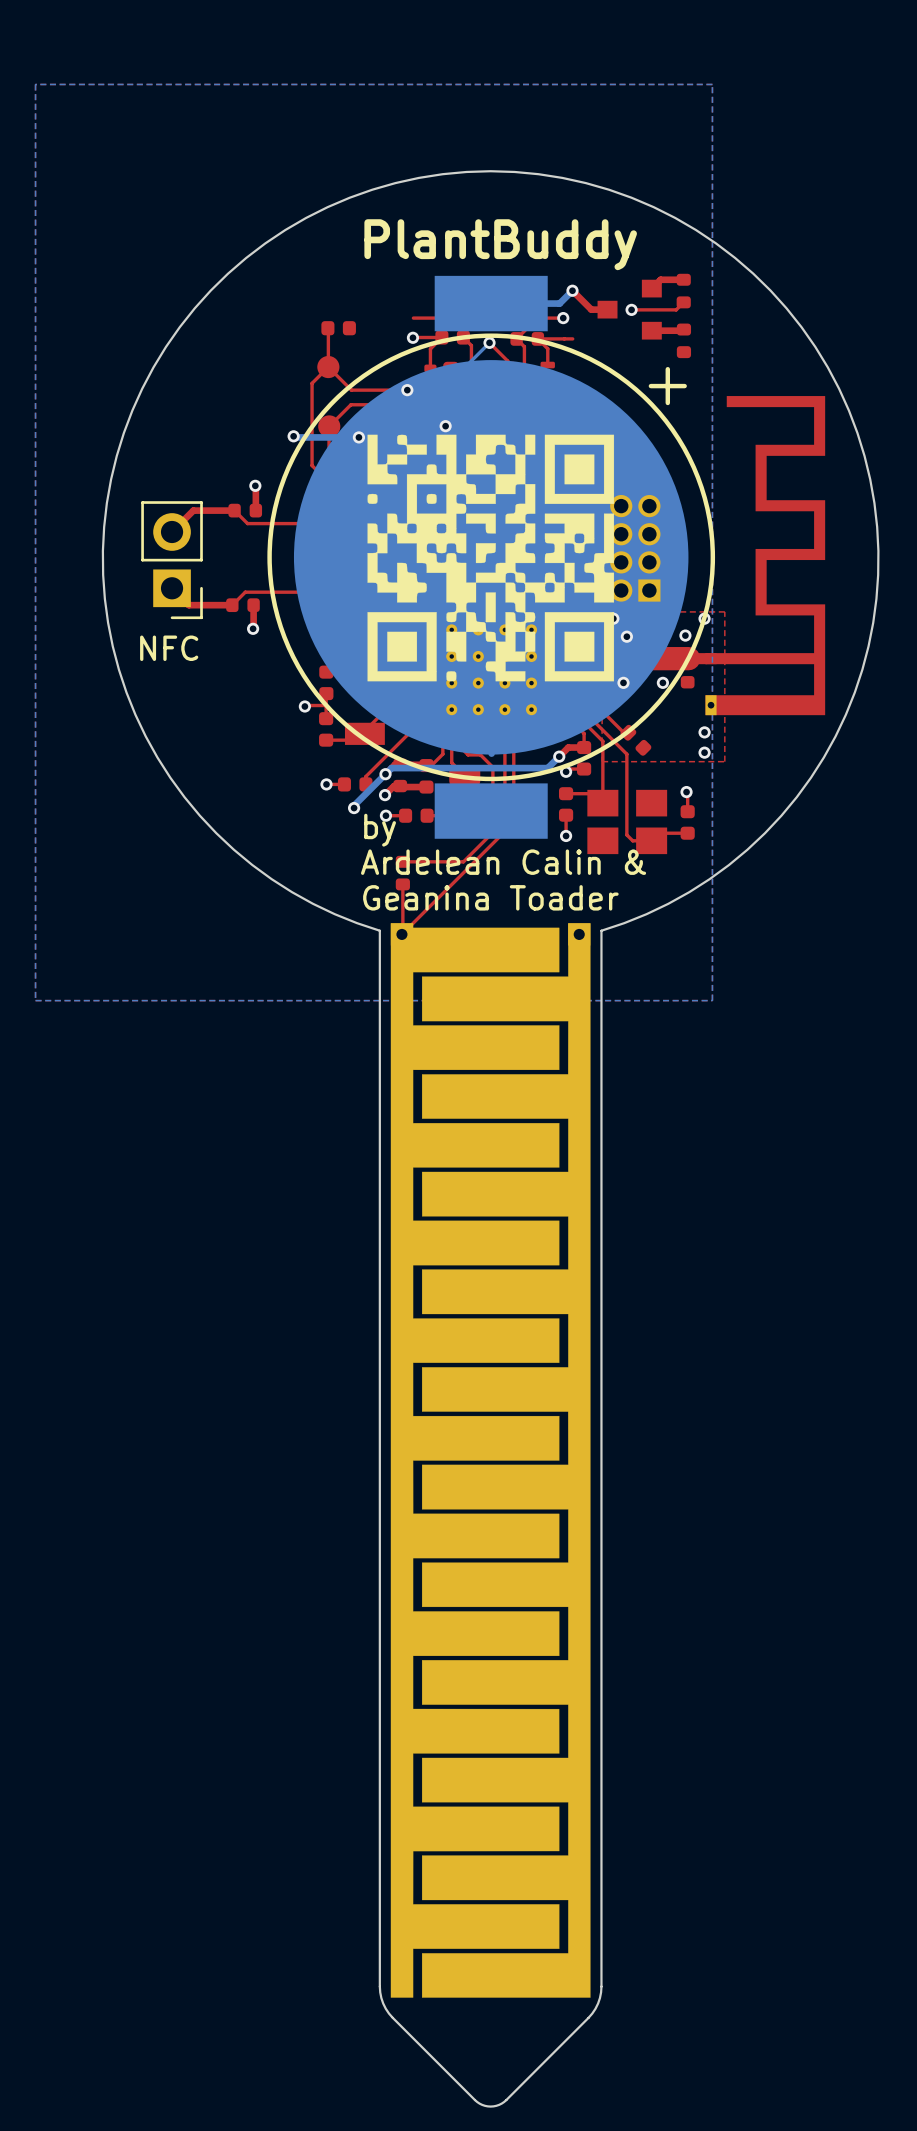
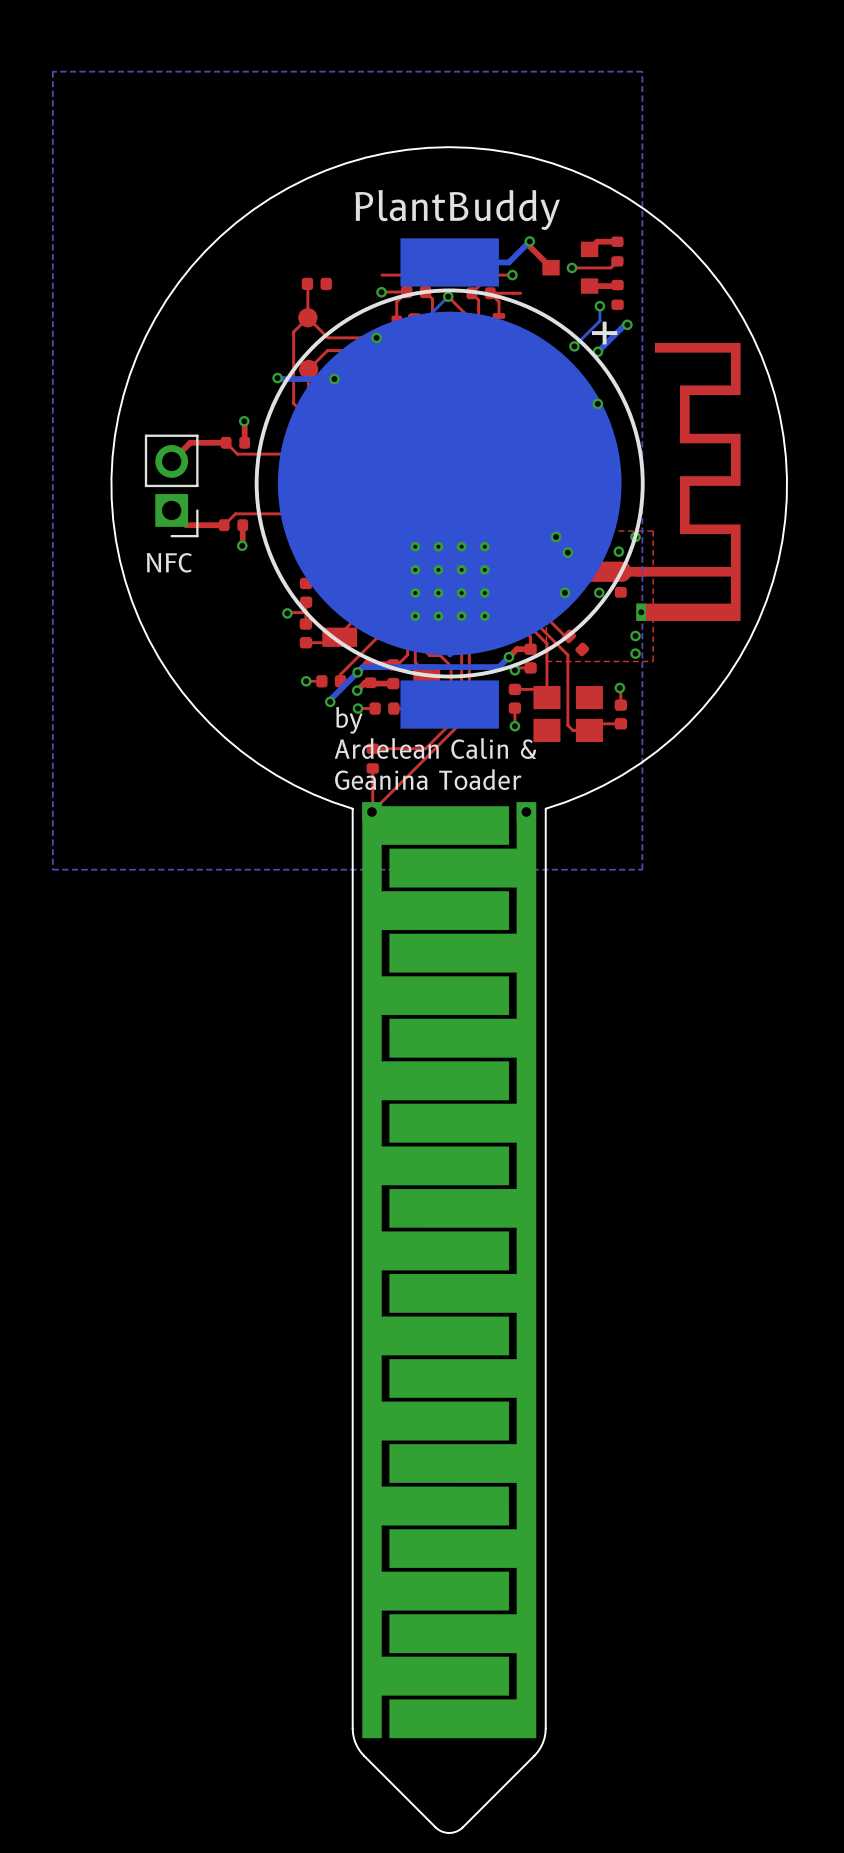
top track: (572, 290) (591, 309) (607, 309) -> (529, 241) (529, 246) (551, 267)
bottom track: (572, 290) (559, 303) -> (529, 241) (508, 262)
via position: (572, 290) -> (529, 241)
bottom track: none -> (599, 306) (599, 320) (574, 346)
via: none -> (599, 306)
bottom track: none -> (627, 324) (624, 324) (597, 351)
via: none -> (627, 324)
via: none -> (574, 346)
via: none -> (597, 351)
via: (445, 426) -> none
drawing: [367, 434, 615, 682] -> none
via: none -> (597, 403)
part: (635, 548) -> none

